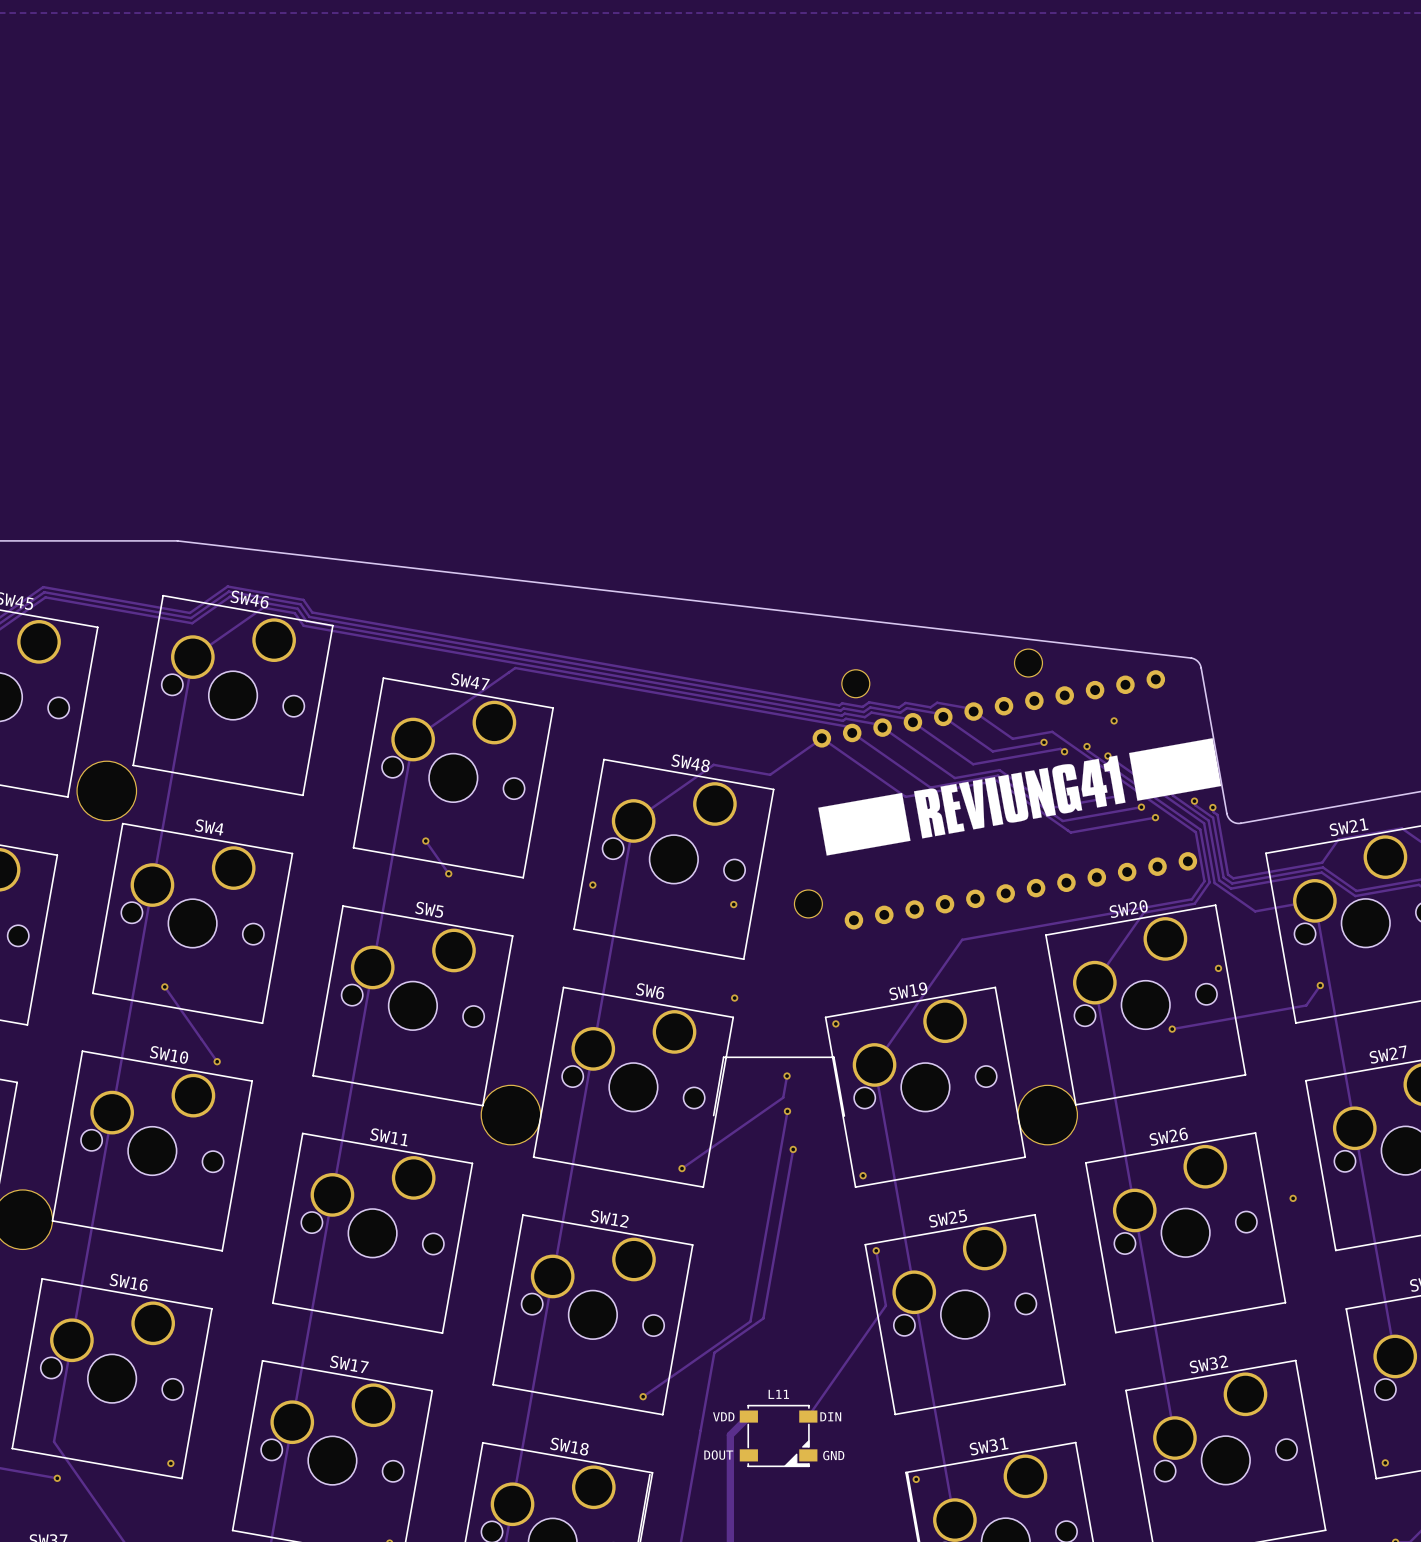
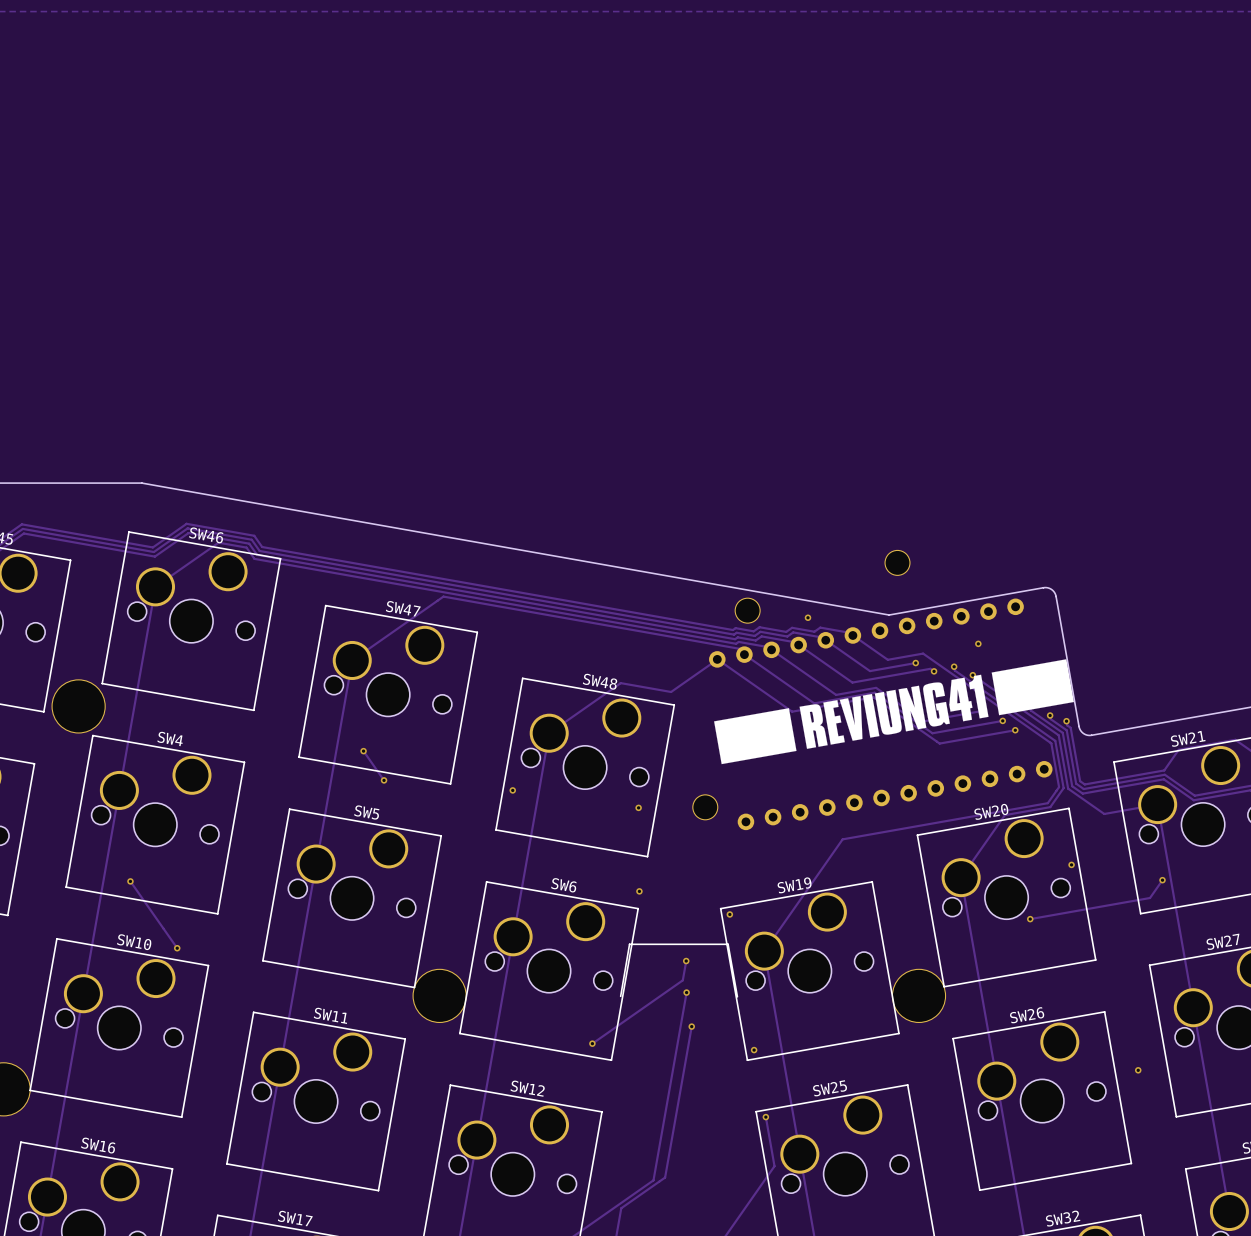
board edge: (177, 540) (1191, 658) (1197, 661) (1201, 667) -> (141, 483) (889, 615) (1044, 587) (1052, 590) (1056, 596)
part position: (1028, 663) -> (897, 562)
via: none -> (807, 617)

